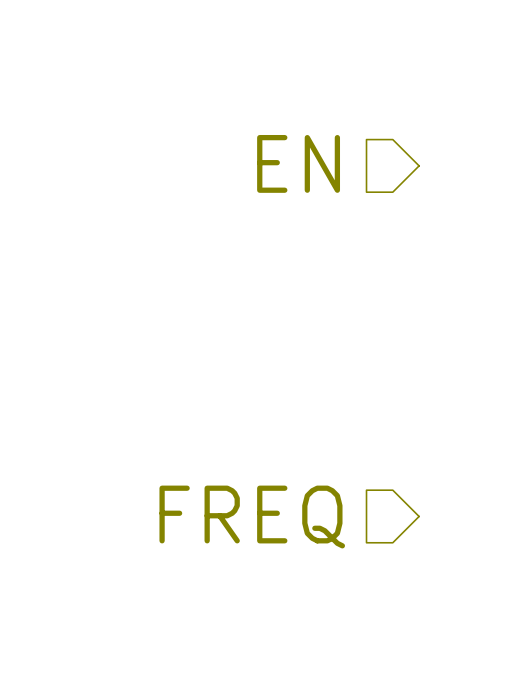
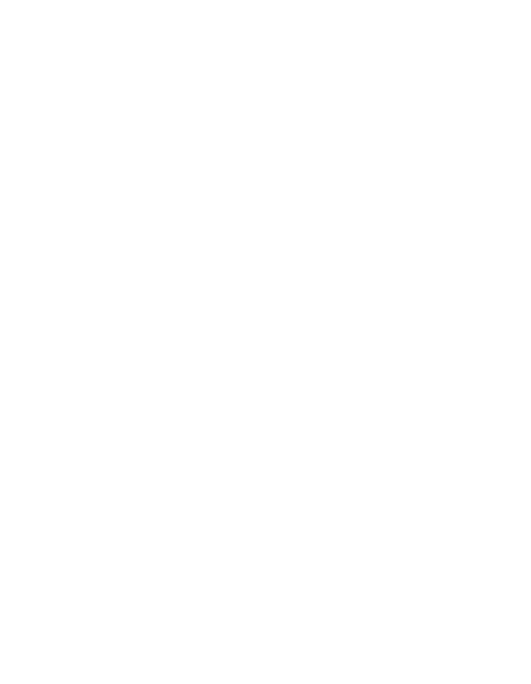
hierarchical label: EN (298, 163) -> none
hierarchical label: FREQ (252, 517) -> none

